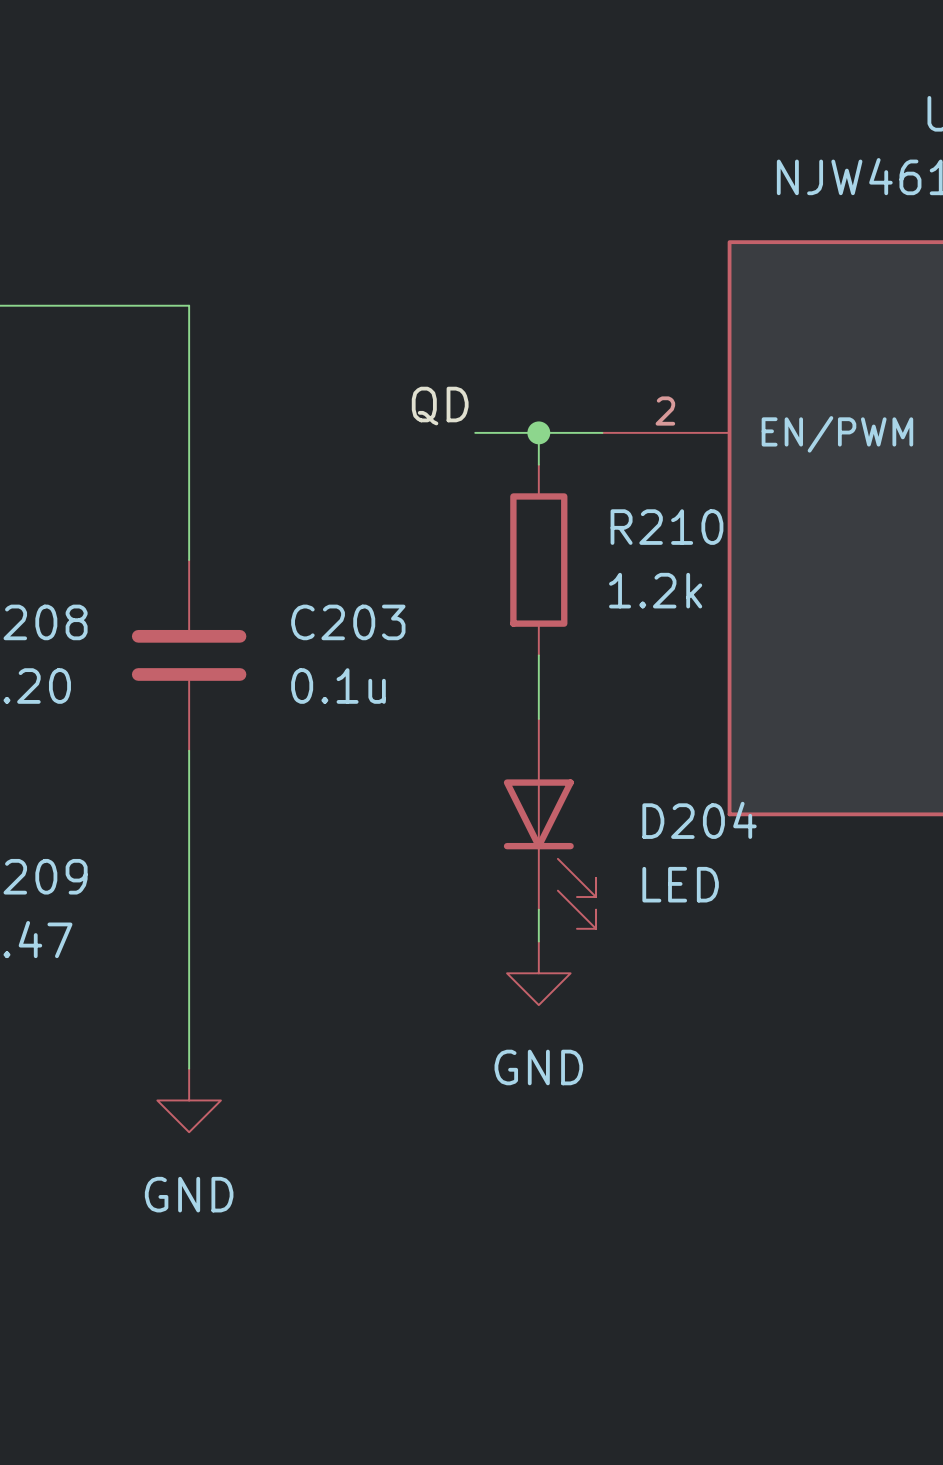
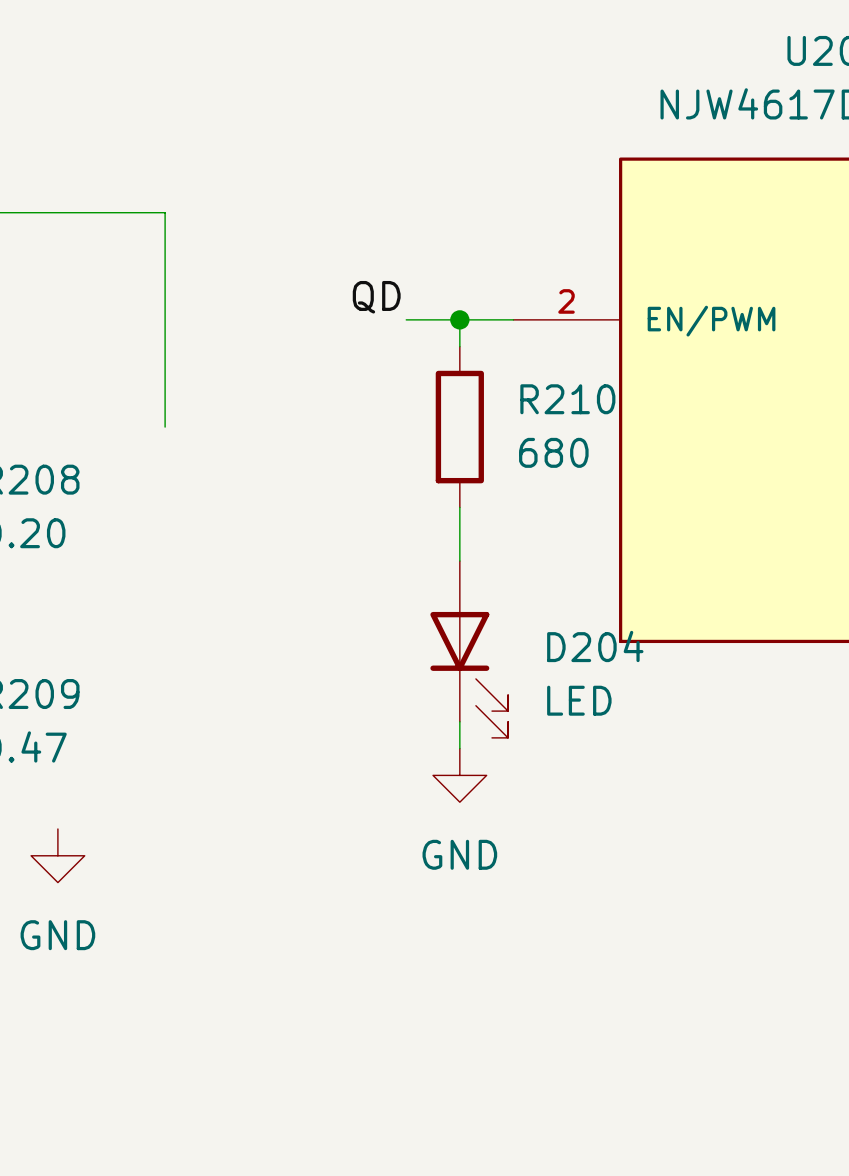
R210 value: 1.2k (655, 590) -> 680 (553, 452)
C203: 0.1u (189, 655) -> none
wire: (189, 750) (189, 1068) -> none
power symbol: none -> GND (57, 855)
power symbol: GND (189, 1100) -> none

